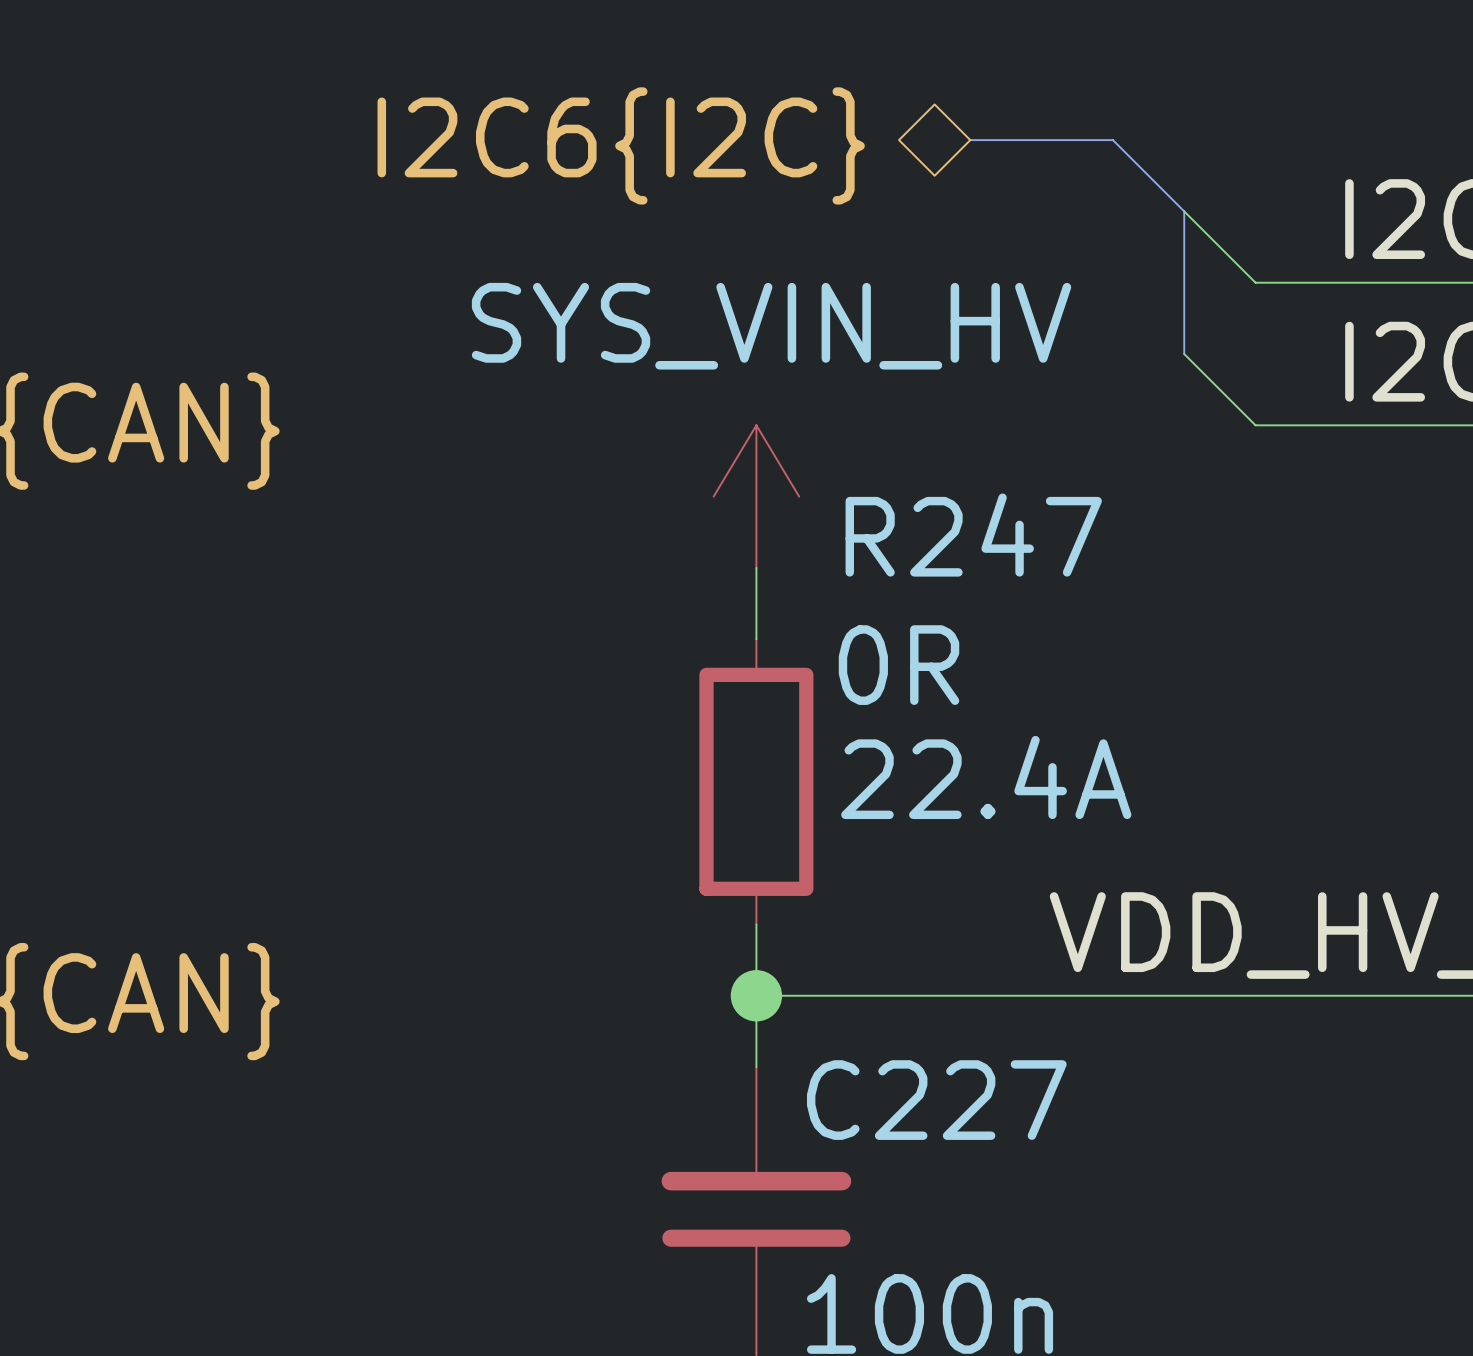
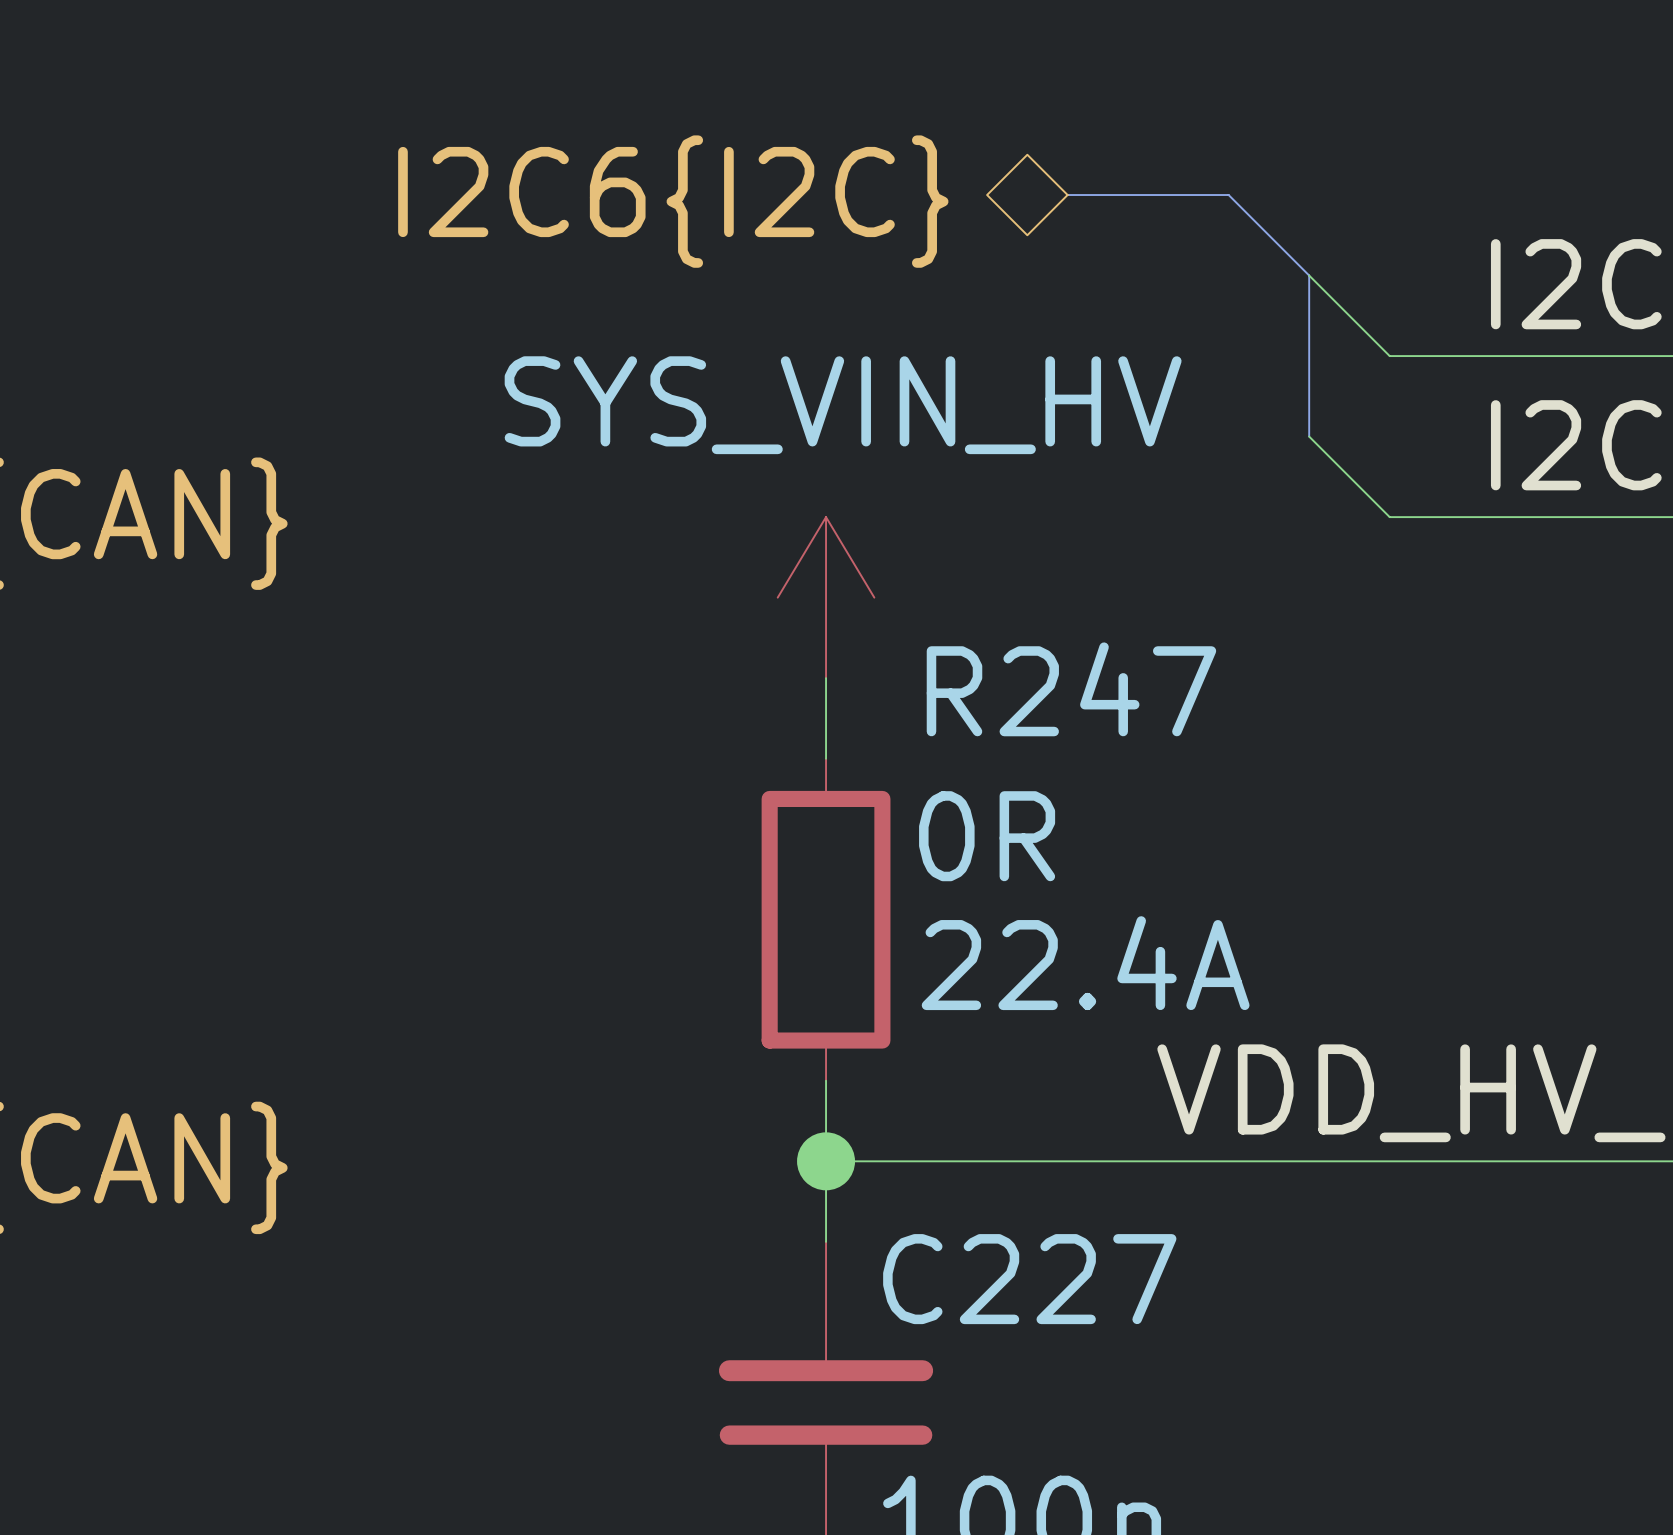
R247 name position: R247 (973, 535) -> R247 (1071, 689)
R247 text position: 0R (899, 665) -> 0R (987, 836)
R247 text position: 22.4A (986, 777) -> 22.4A (1085, 963)

